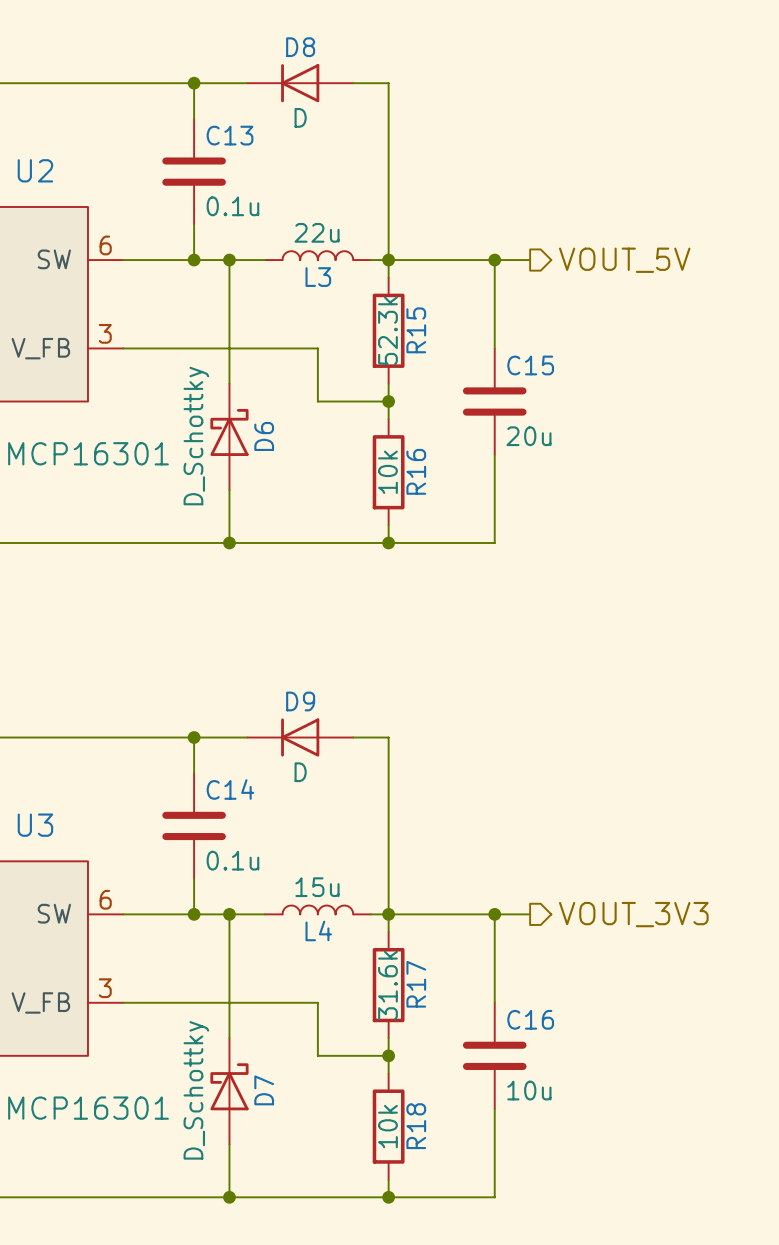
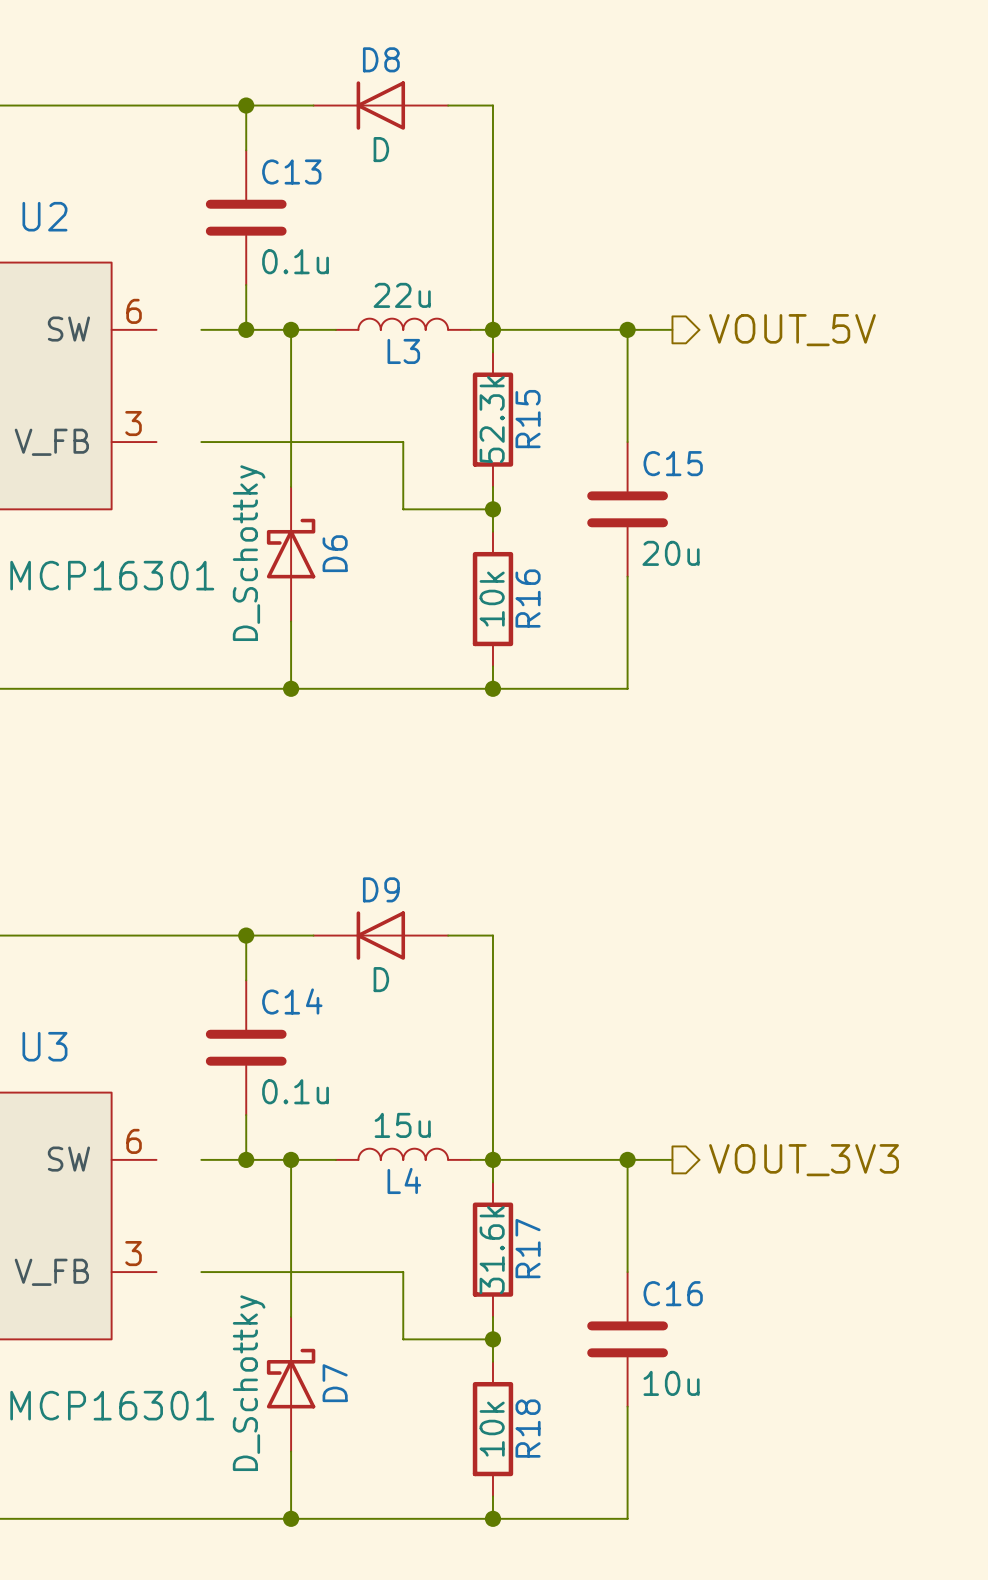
wire: (123, 260) (158, 260) -> none
wire: (123, 348) (158, 348) -> none
wire: (123, 914) (158, 914) -> none
wire: (123, 1002) (158, 1002) -> none

